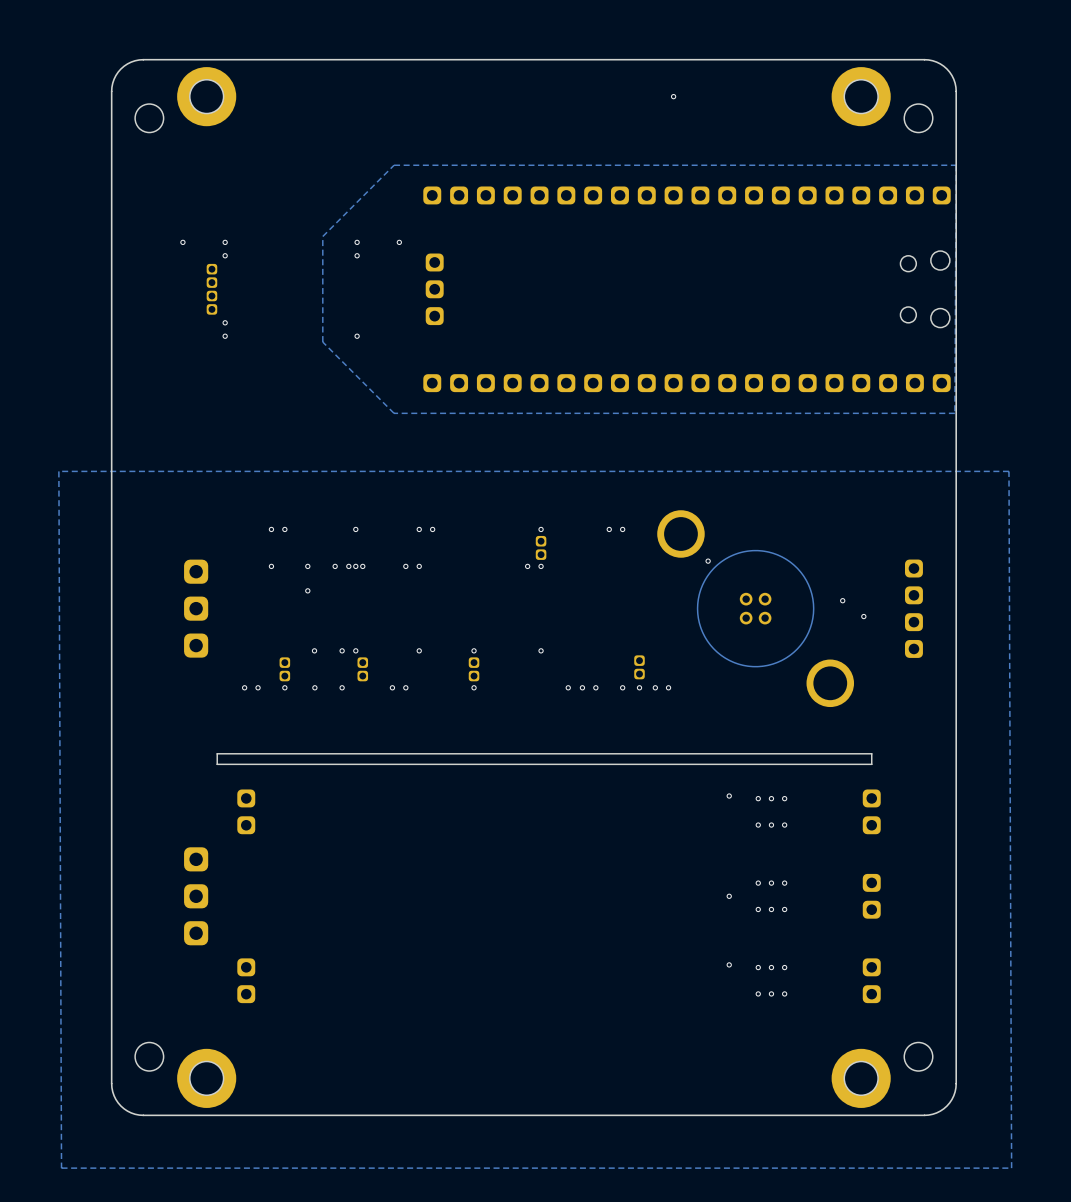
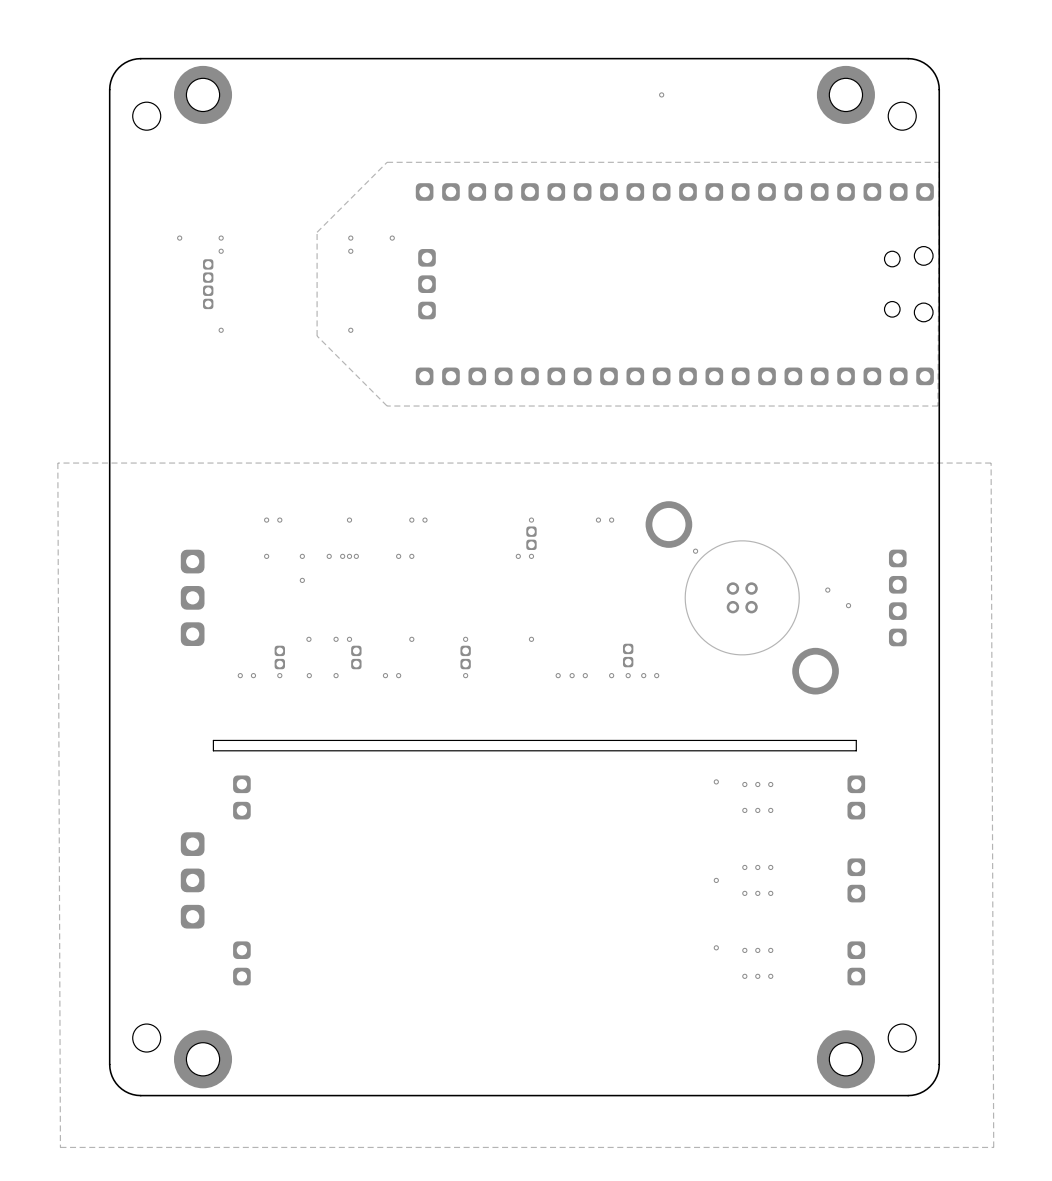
via: (225, 322) -> none

